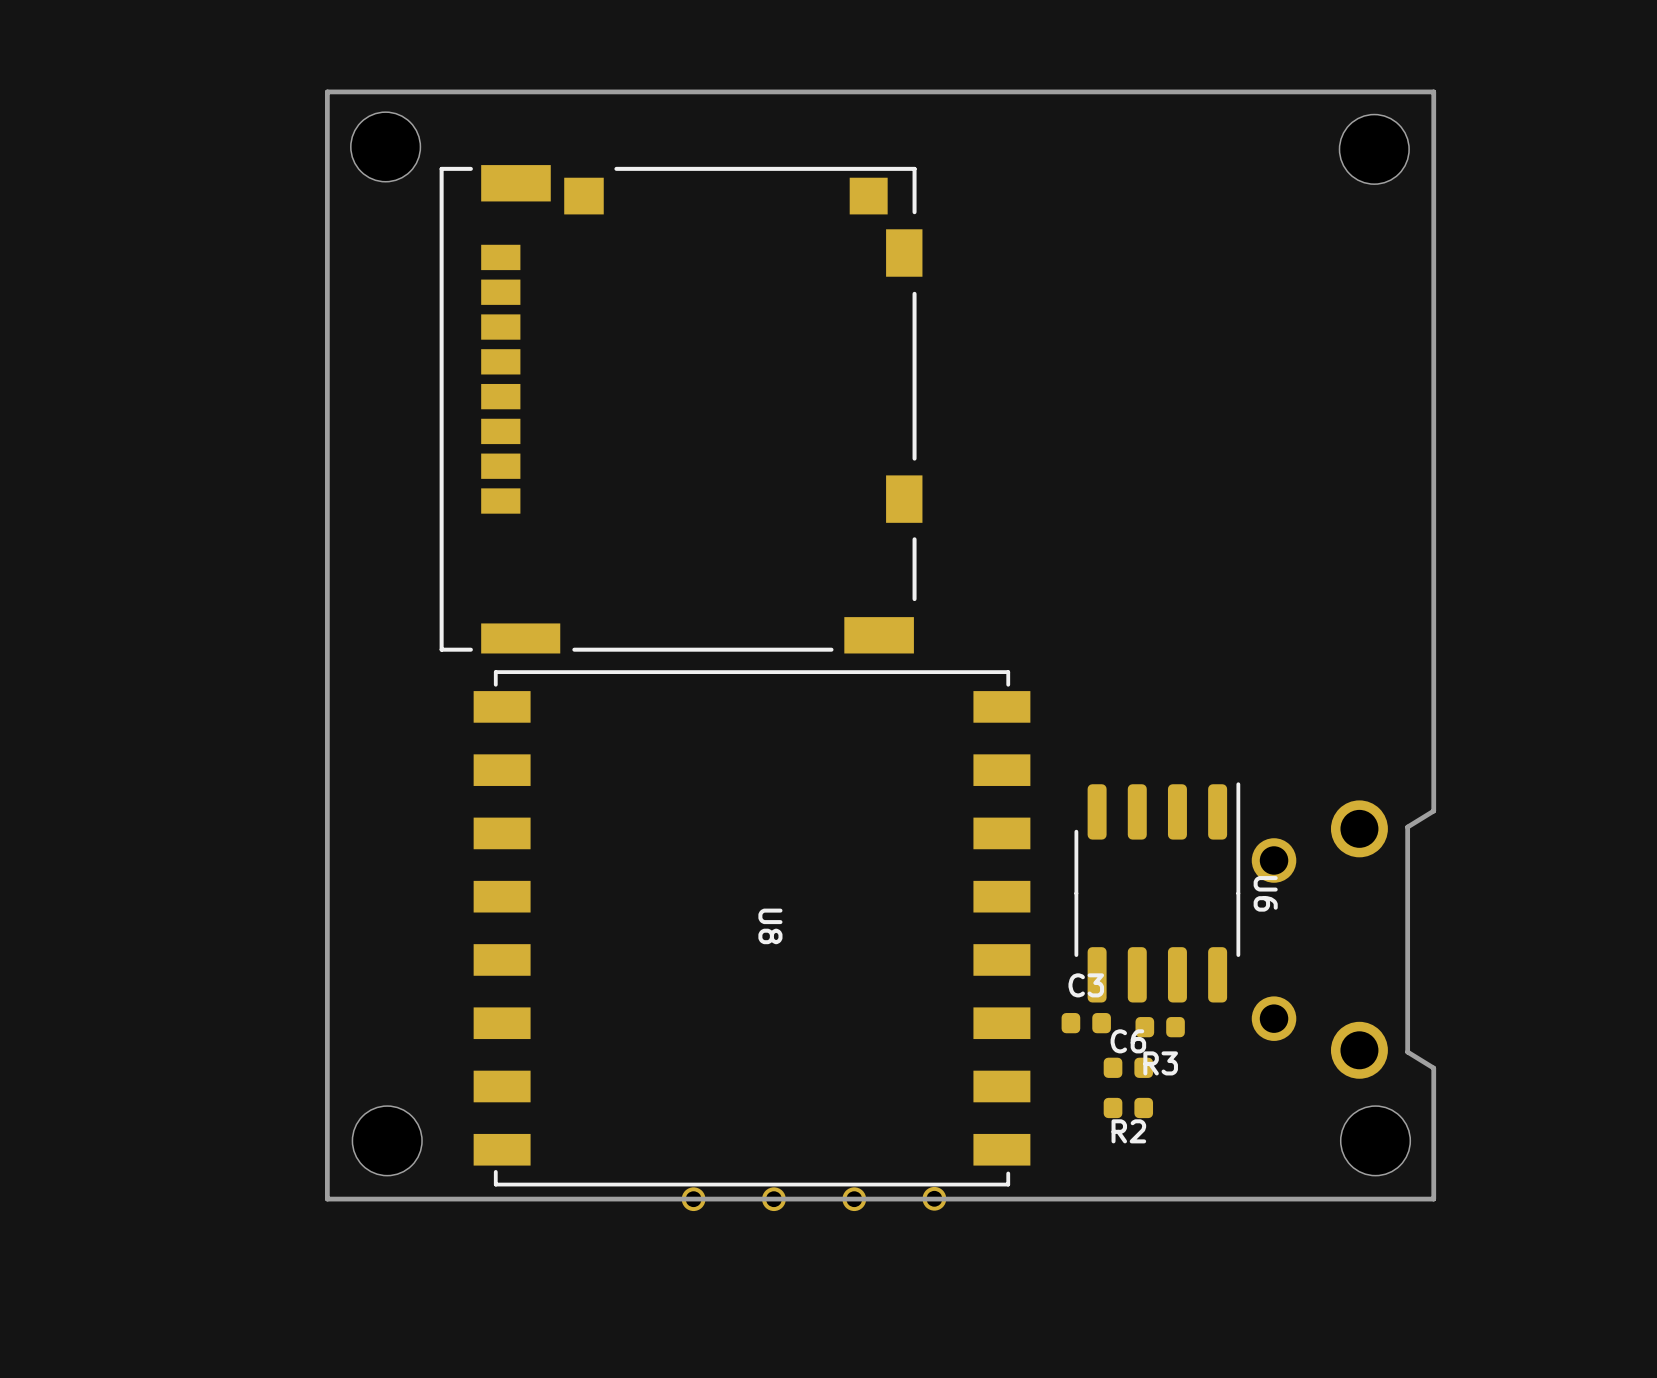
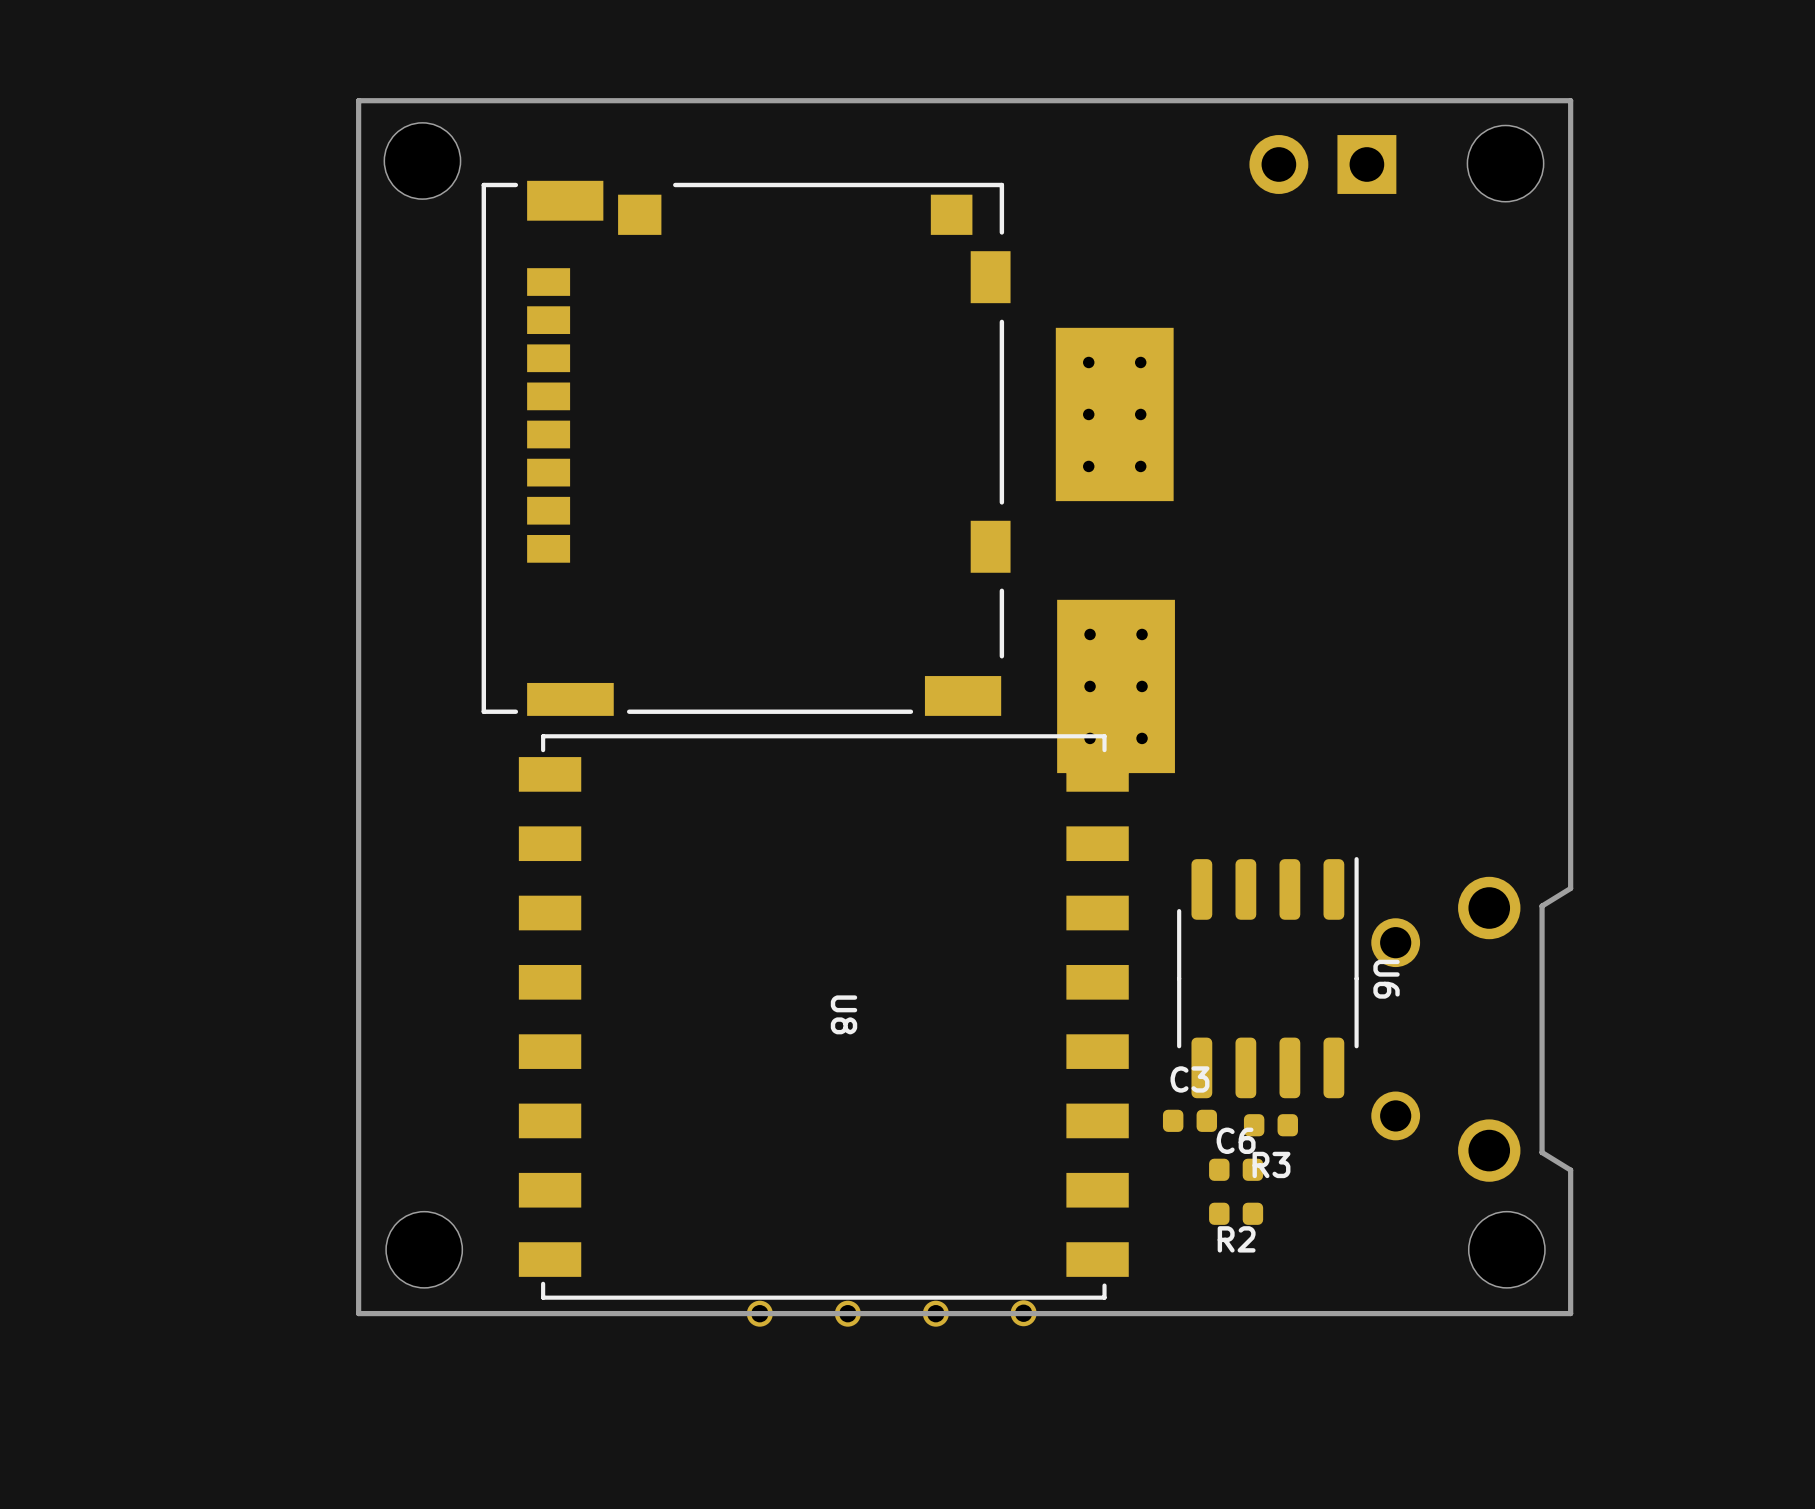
part: none -> (1322, 164)
part: none -> (1114, 414)
part: none -> (1116, 686)

